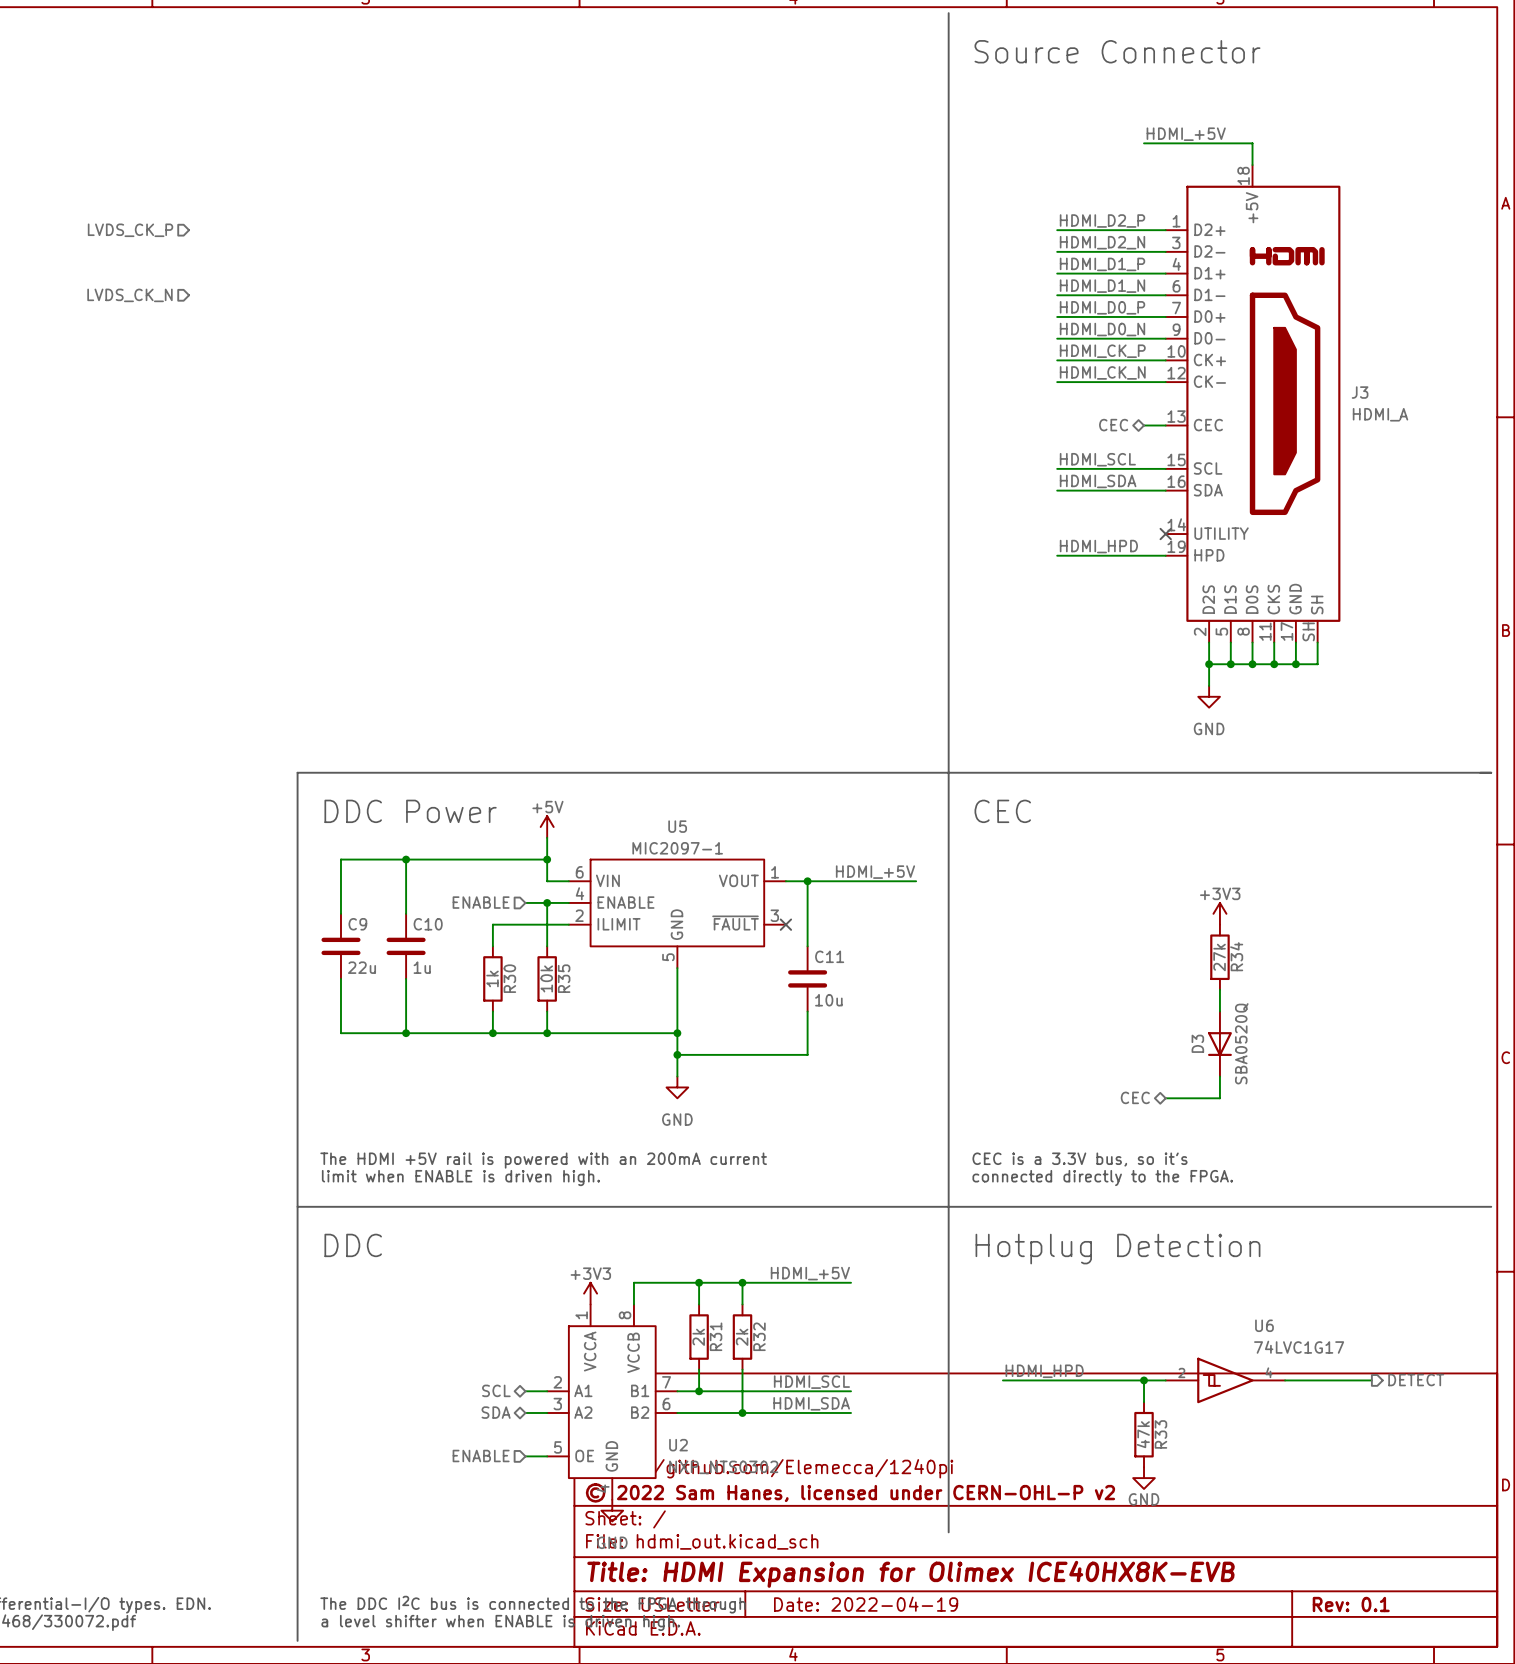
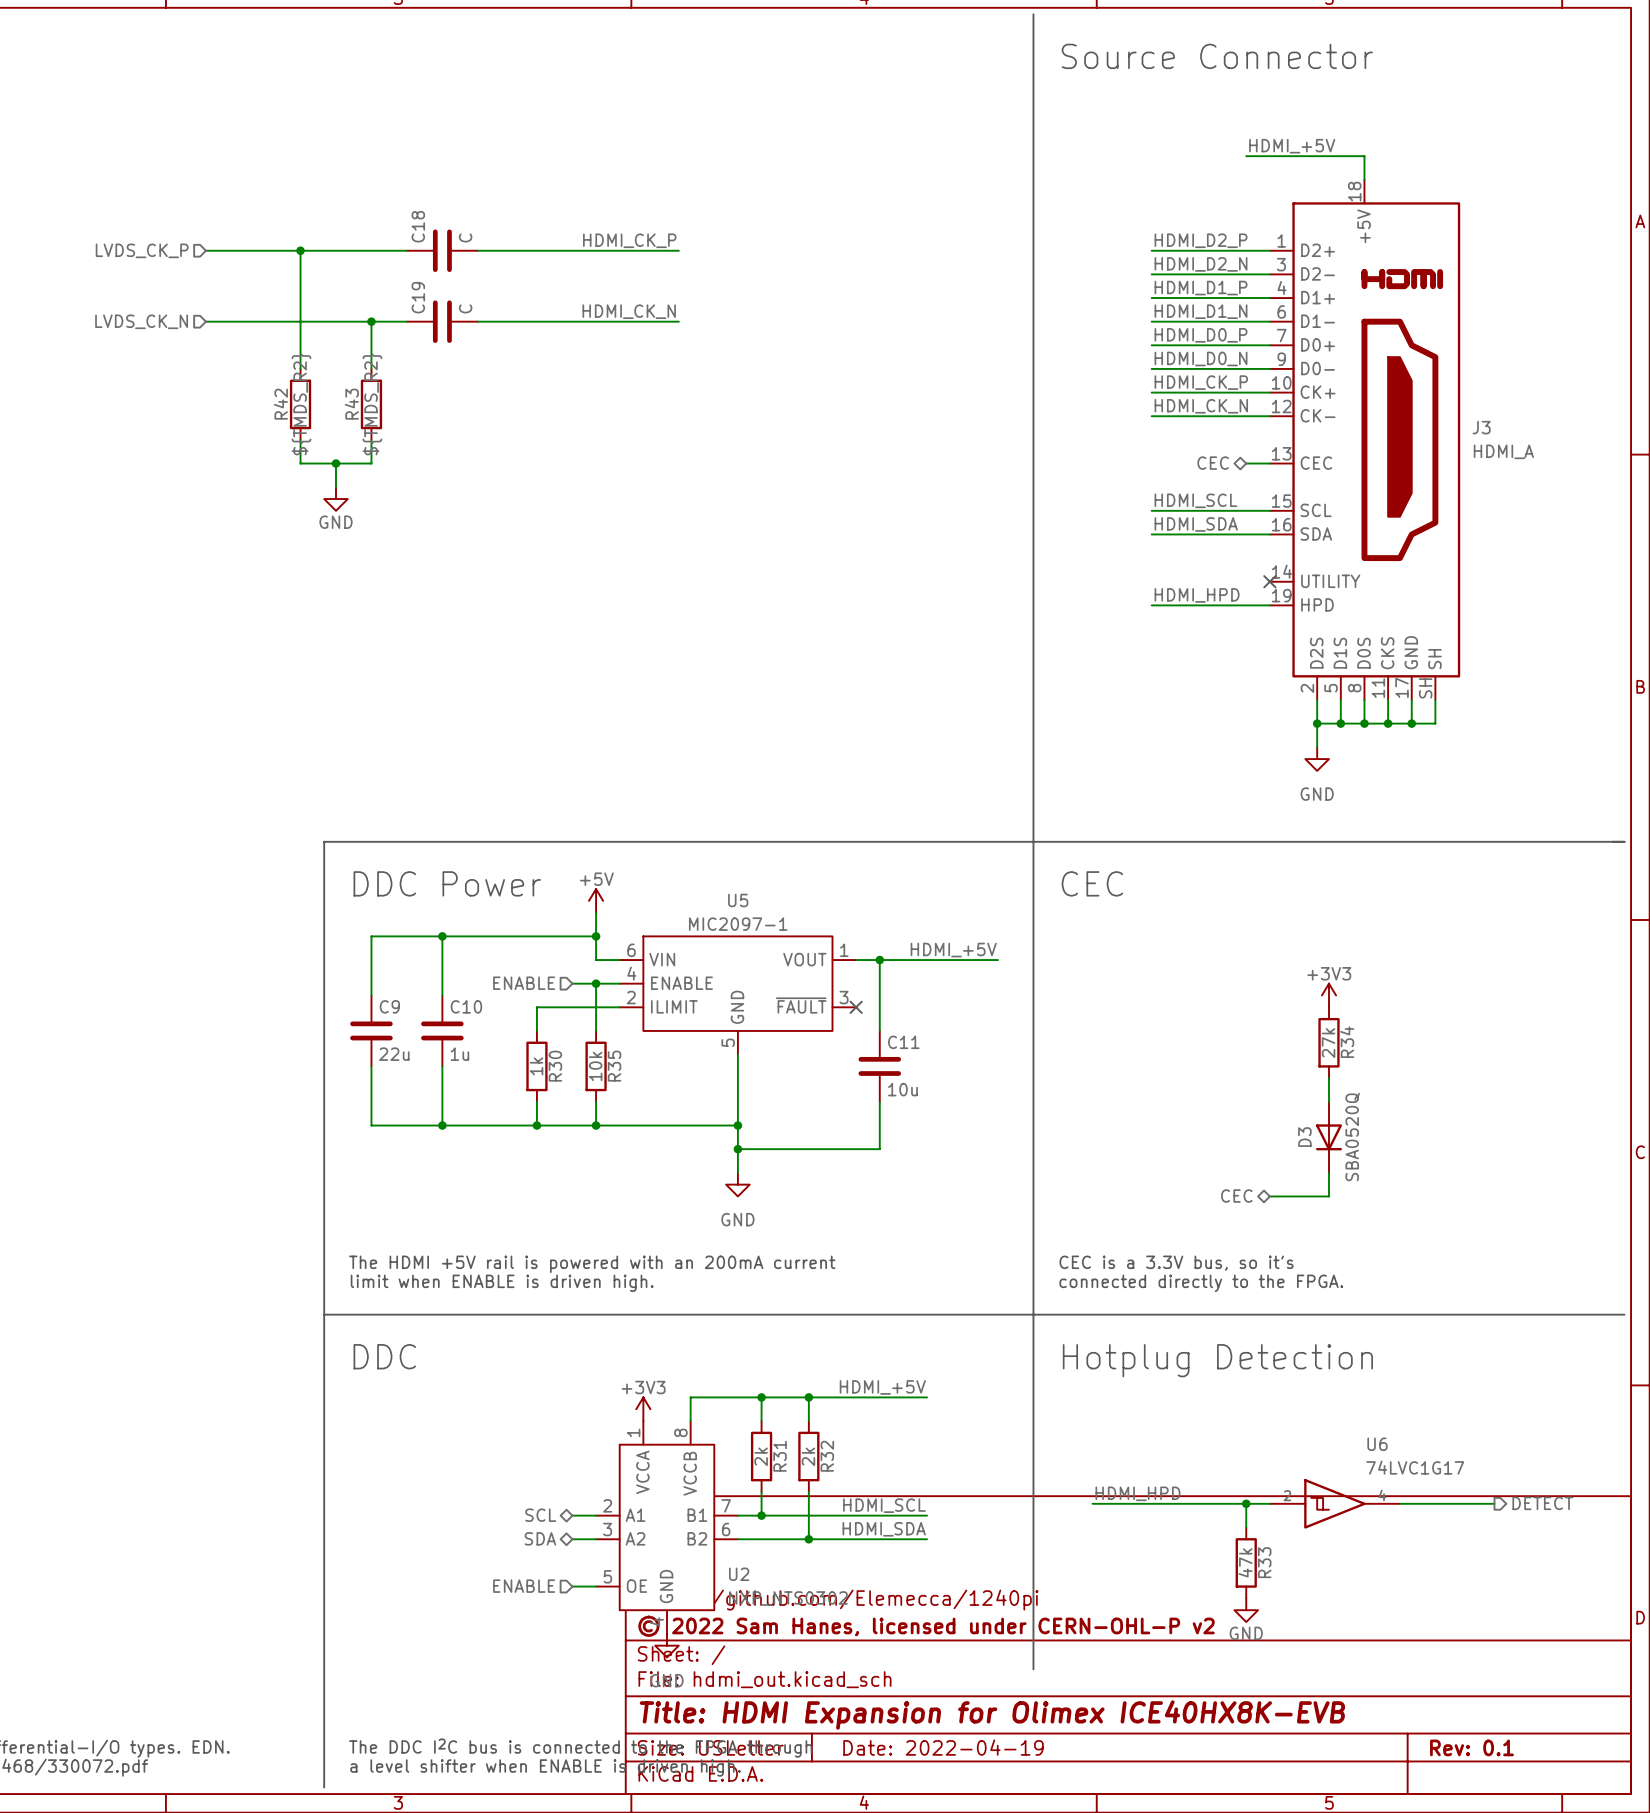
label: none -> HDMI_CK_P (629, 240)
wire: none -> (205, 250) (406, 250)
wire: none -> (300, 250) (300, 368)
junction: none -> (300, 250)
C18: none -> C (442, 250)
wire: none -> (477, 250) (678, 250)
label: none -> HDMI_CK_N (629, 311)
wire: none -> (205, 321) (406, 321)
wire: none -> (371, 321) (371, 368)
junction: none -> (371, 321)
C19: none -> C (442, 321)
wire: none -> (477, 321) (678, 321)
R42: none -> ${TMDS_R2} (300, 404)
R43: none -> ${TMDS_R2} (371, 404)
wire: none -> (300, 439) (300, 463) (371, 463) (371, 439)
wire: none -> (336, 463) (336, 487)
junction: none -> (336, 463)
power symbol: none -> GND (336, 498)

